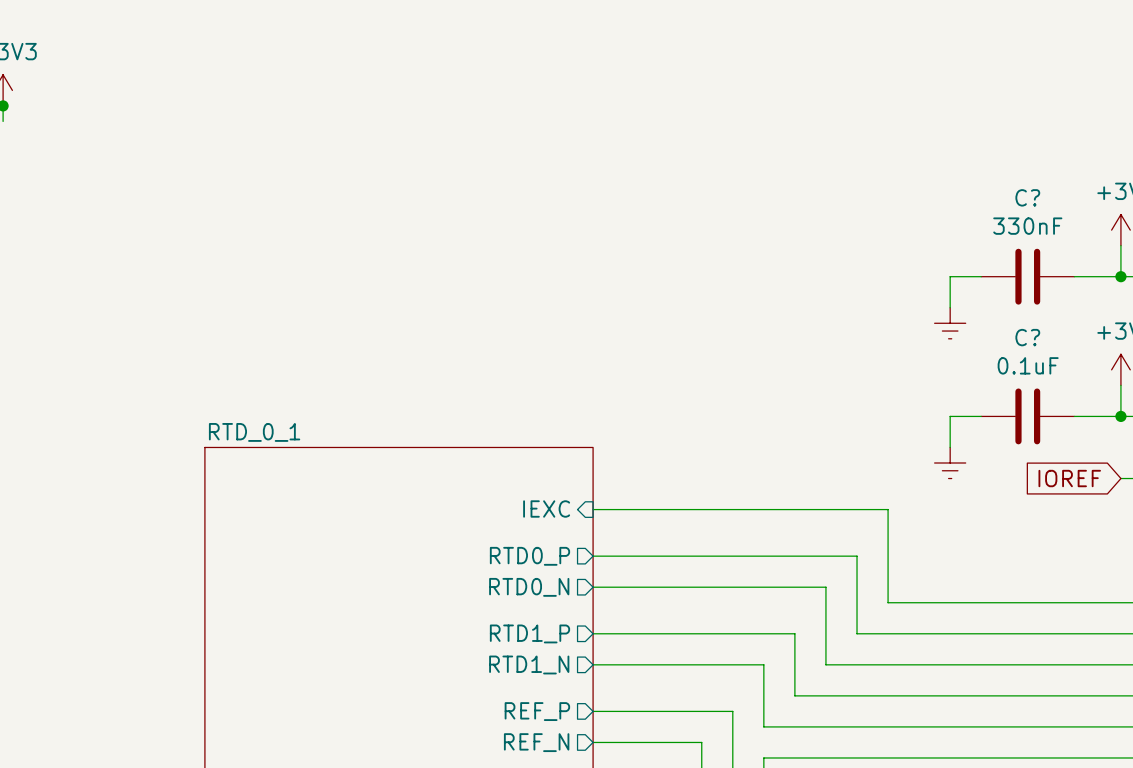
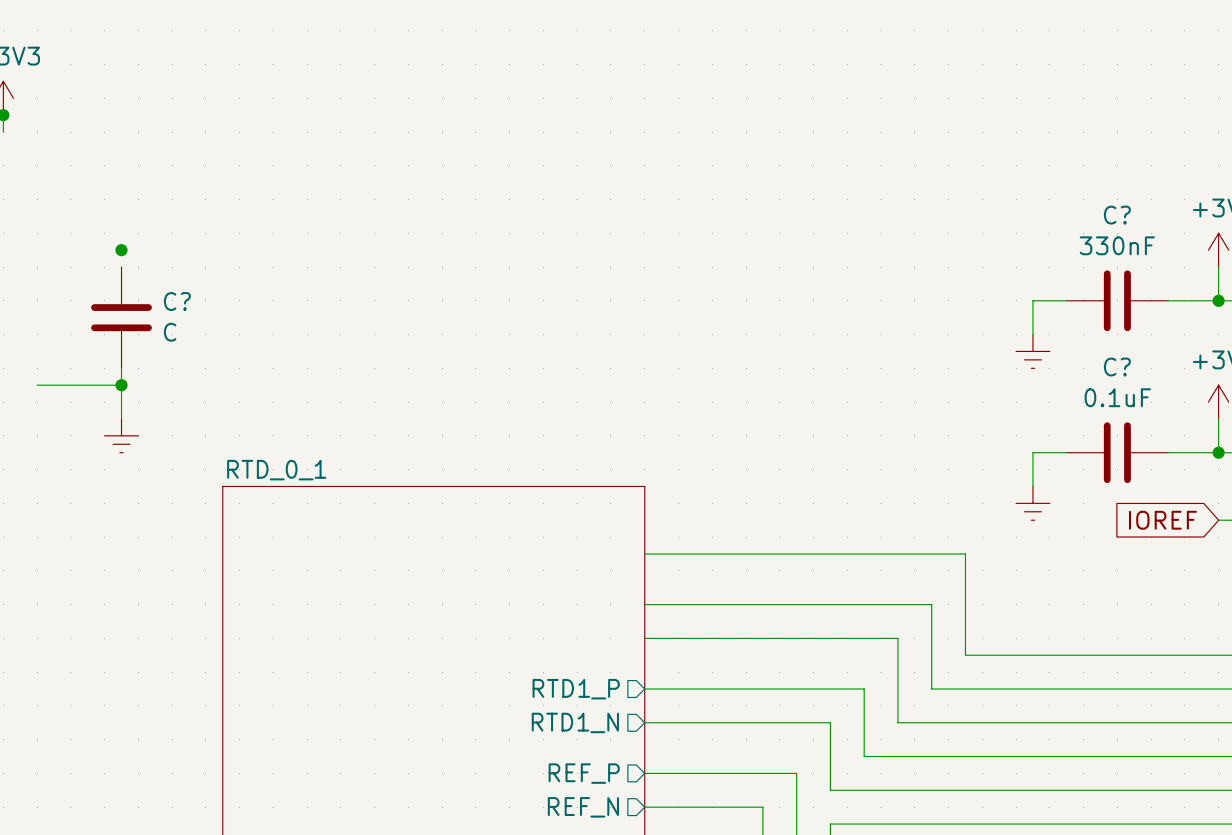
junction: none -> (121, 250)
C?: none -> C (121, 317)
wire: none -> (121, 368) (121, 418)
wire: none -> (37, 385) (121, 385)
junction: none -> (121, 385)
power symbol: none -> (121, 435)
sheet pin: IEXC (546, 508) -> none
sheet pin: RTD0_P (529, 556) -> none
sheet pin: RTD0_N (529, 587) -> none

